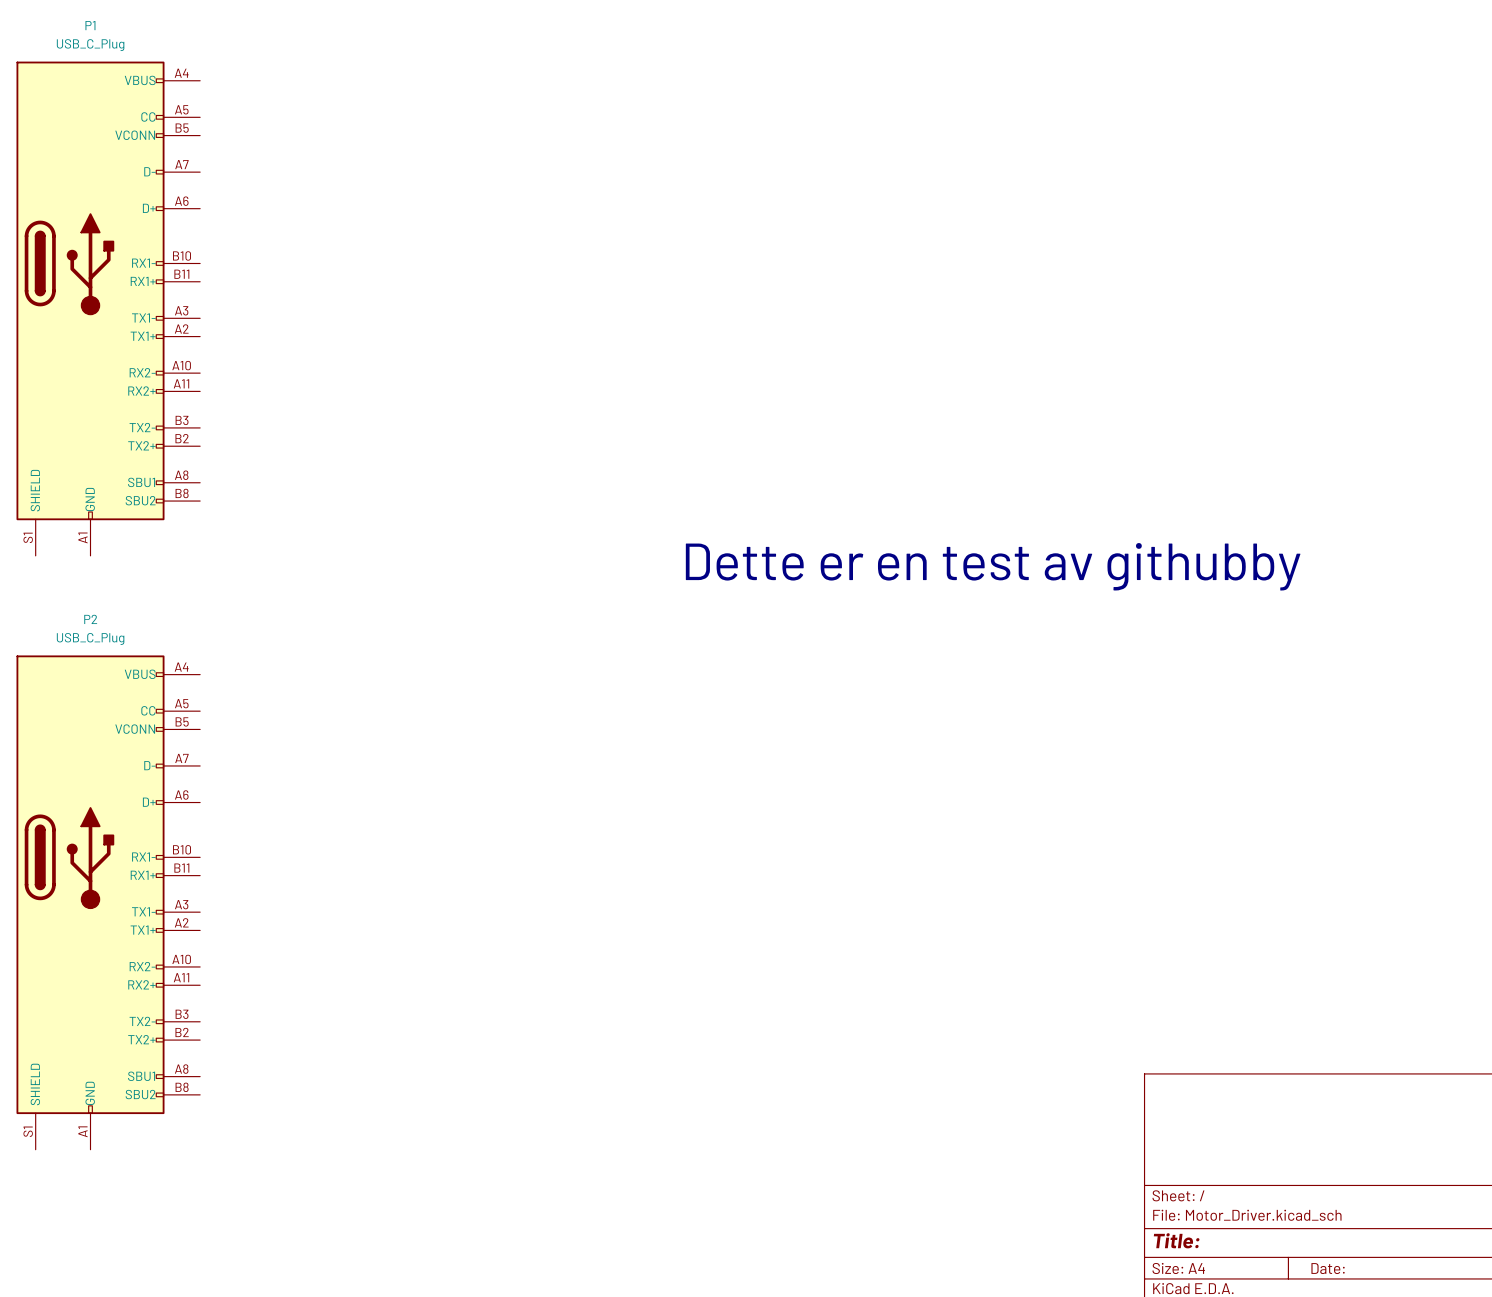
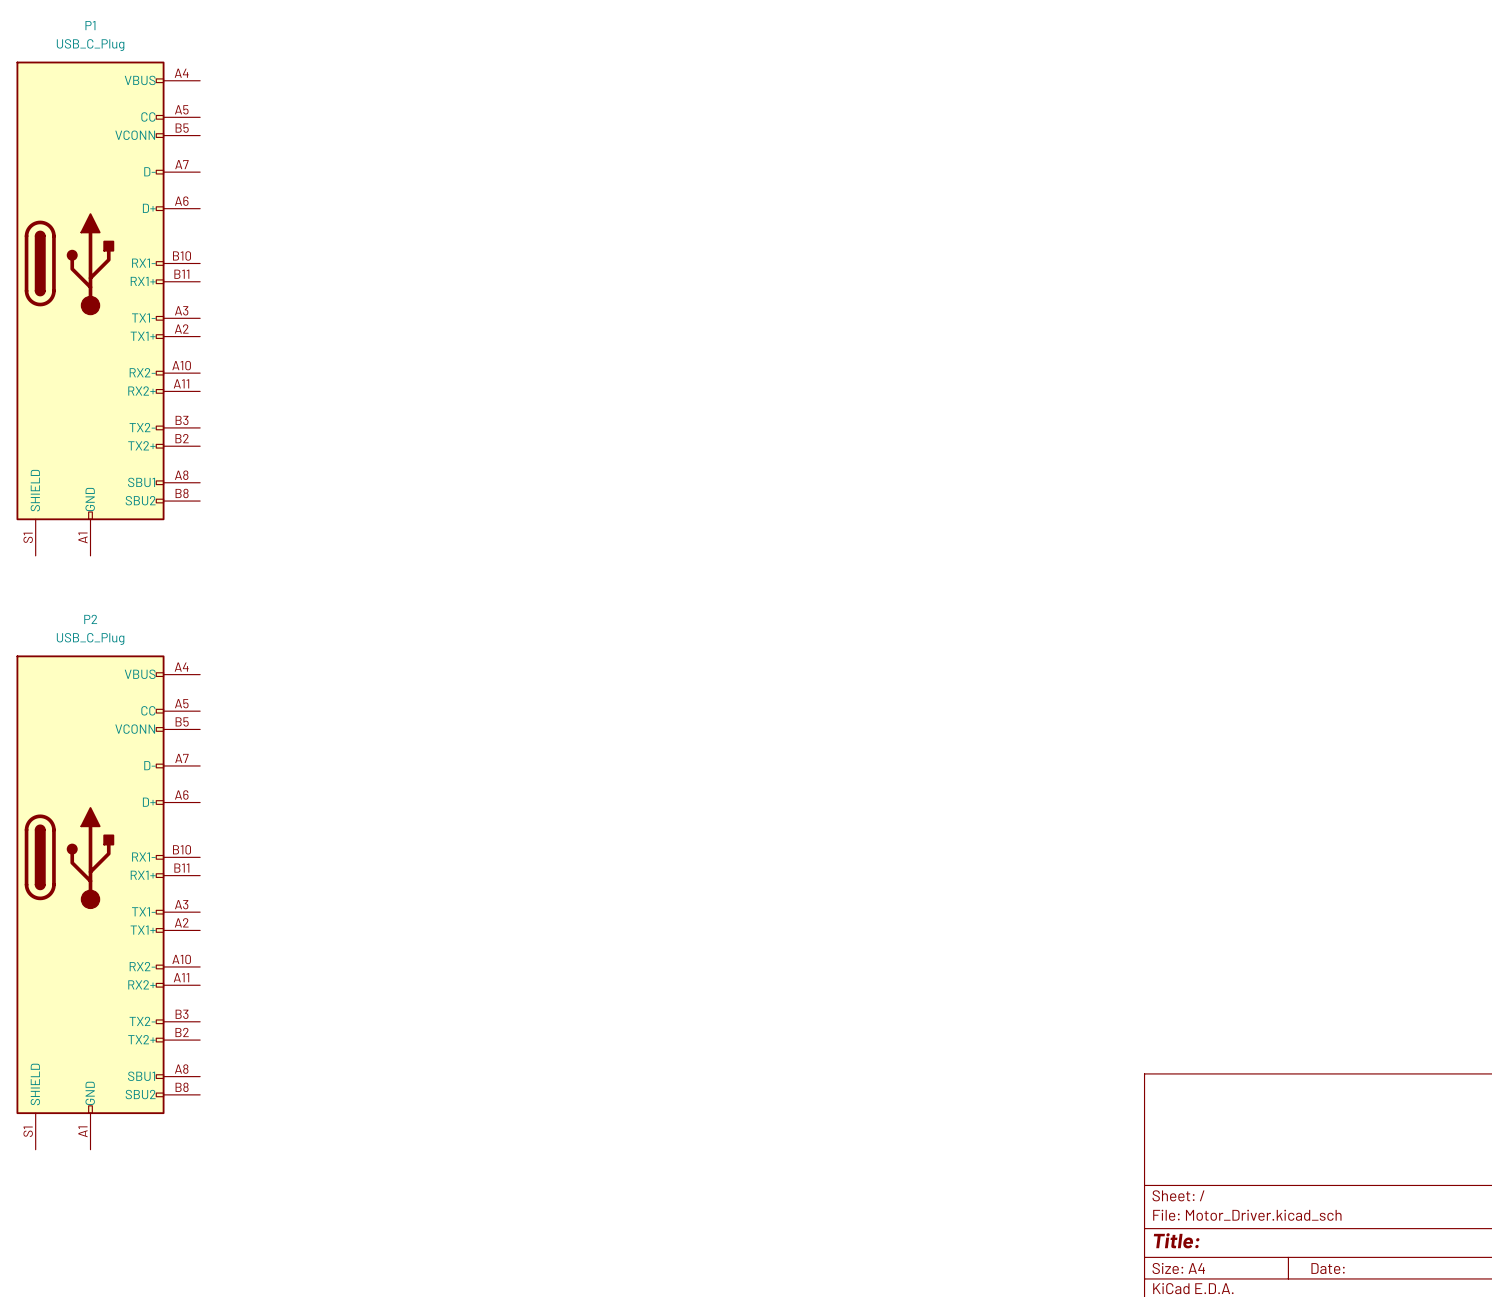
text: Dette er en test av githubby (993, 566) -> none

